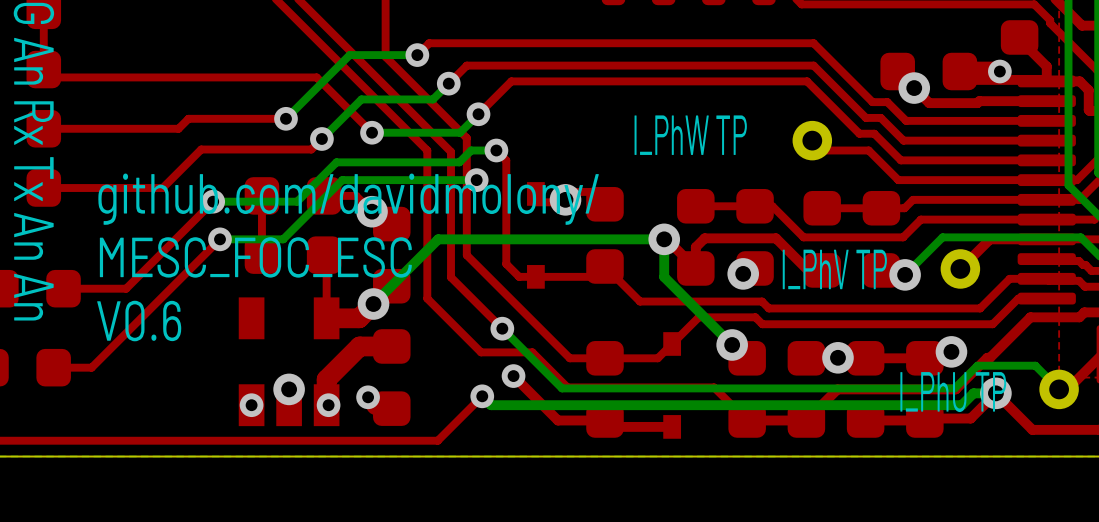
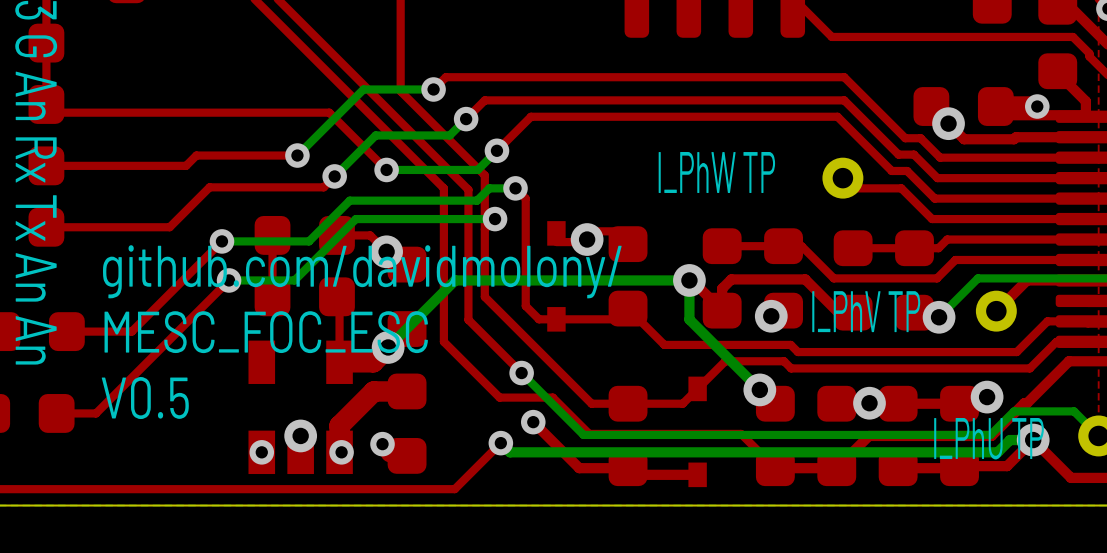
text position: github.com/davidmolony/ (348, 199) -> github.com/davidmolony/ (362, 271)
text position: MESC_FOC_ESC (255, 257) -> MESC_FOC_ESC (266, 332)
text: V0.6 (139, 321) -> V0.5 (145, 398)

